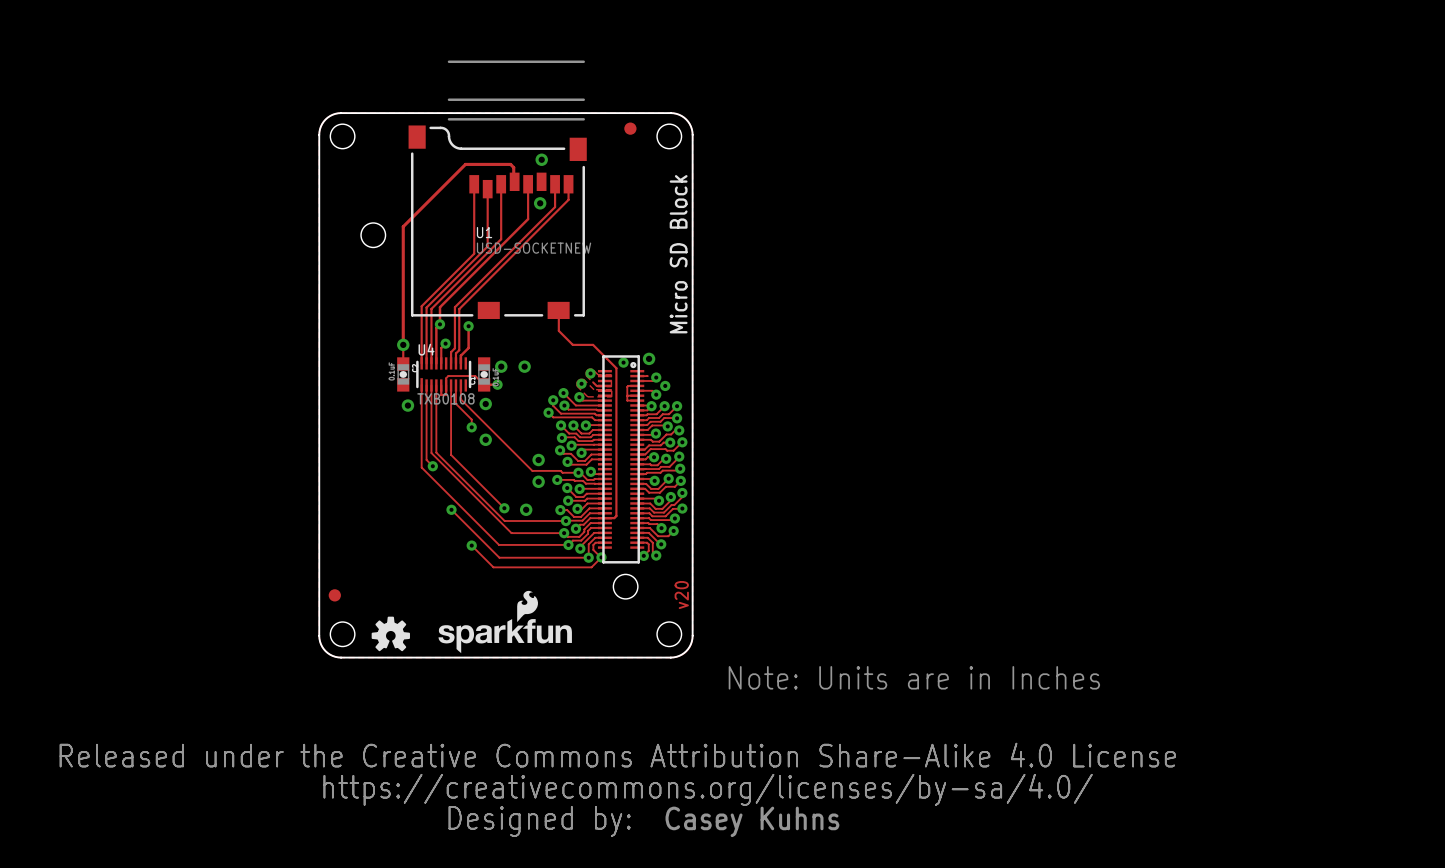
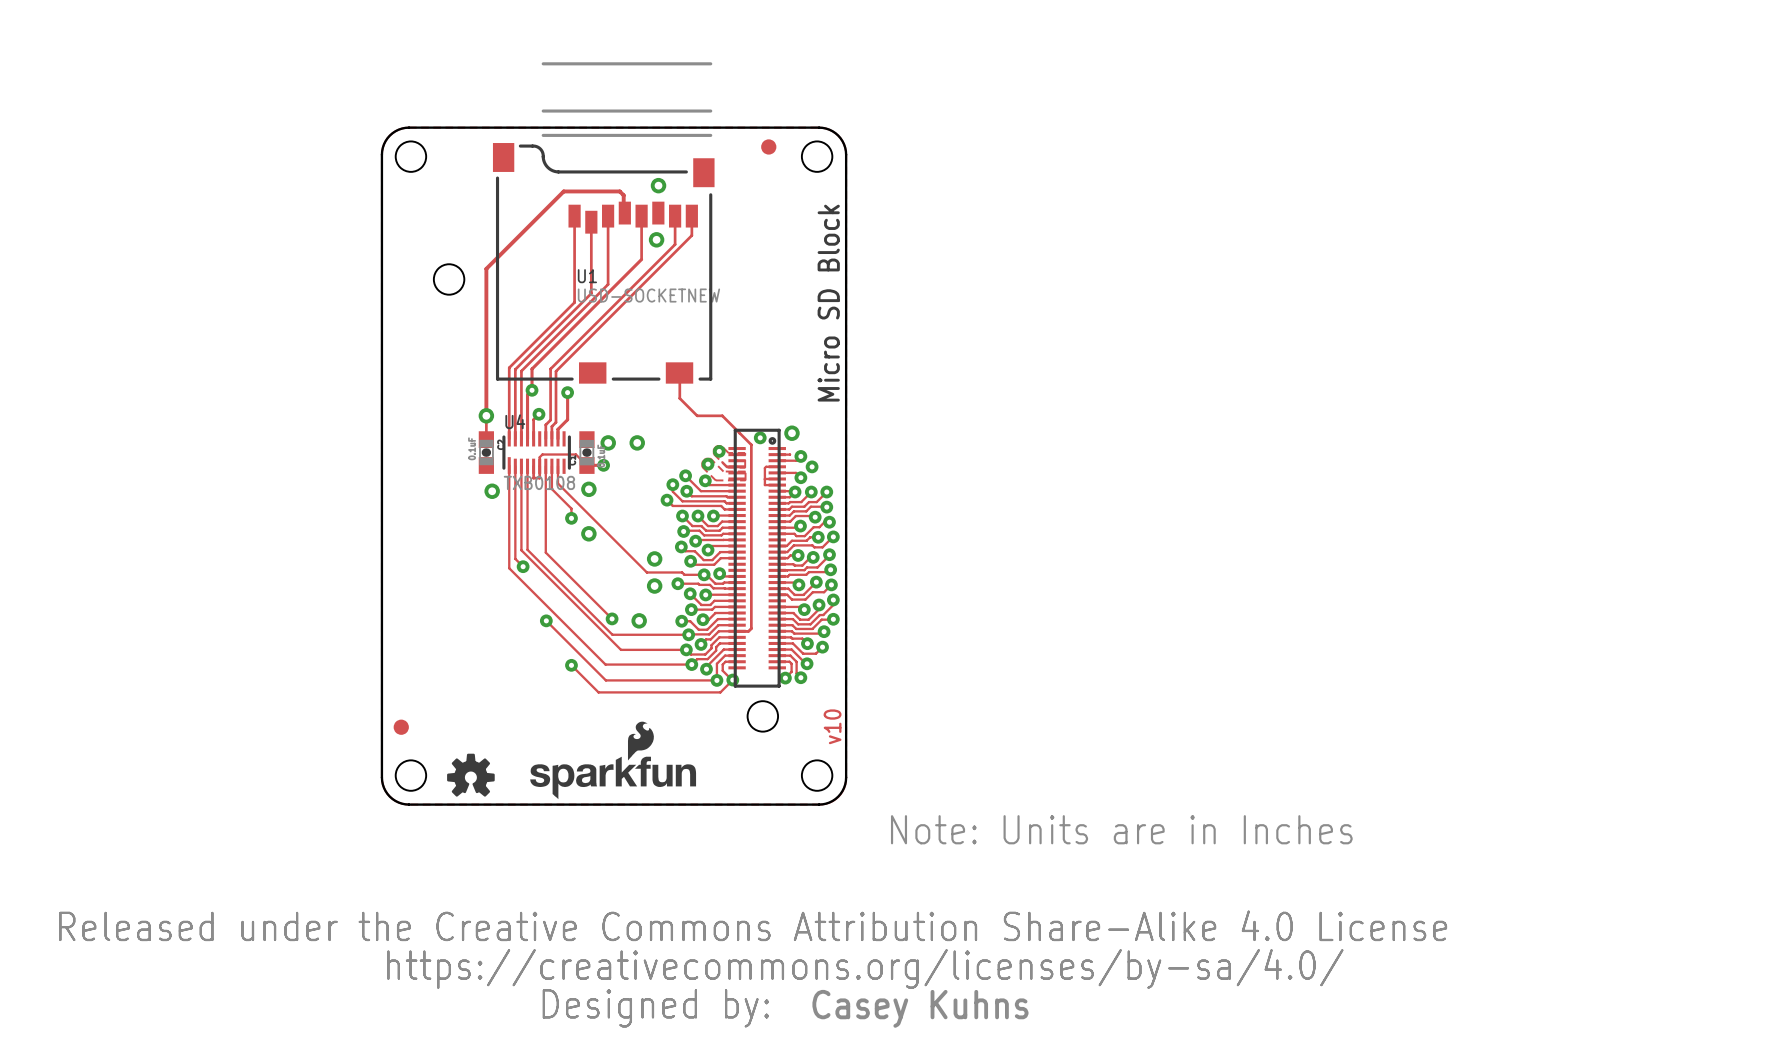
text: v20 (681, 595) -> v10 (832, 726)

